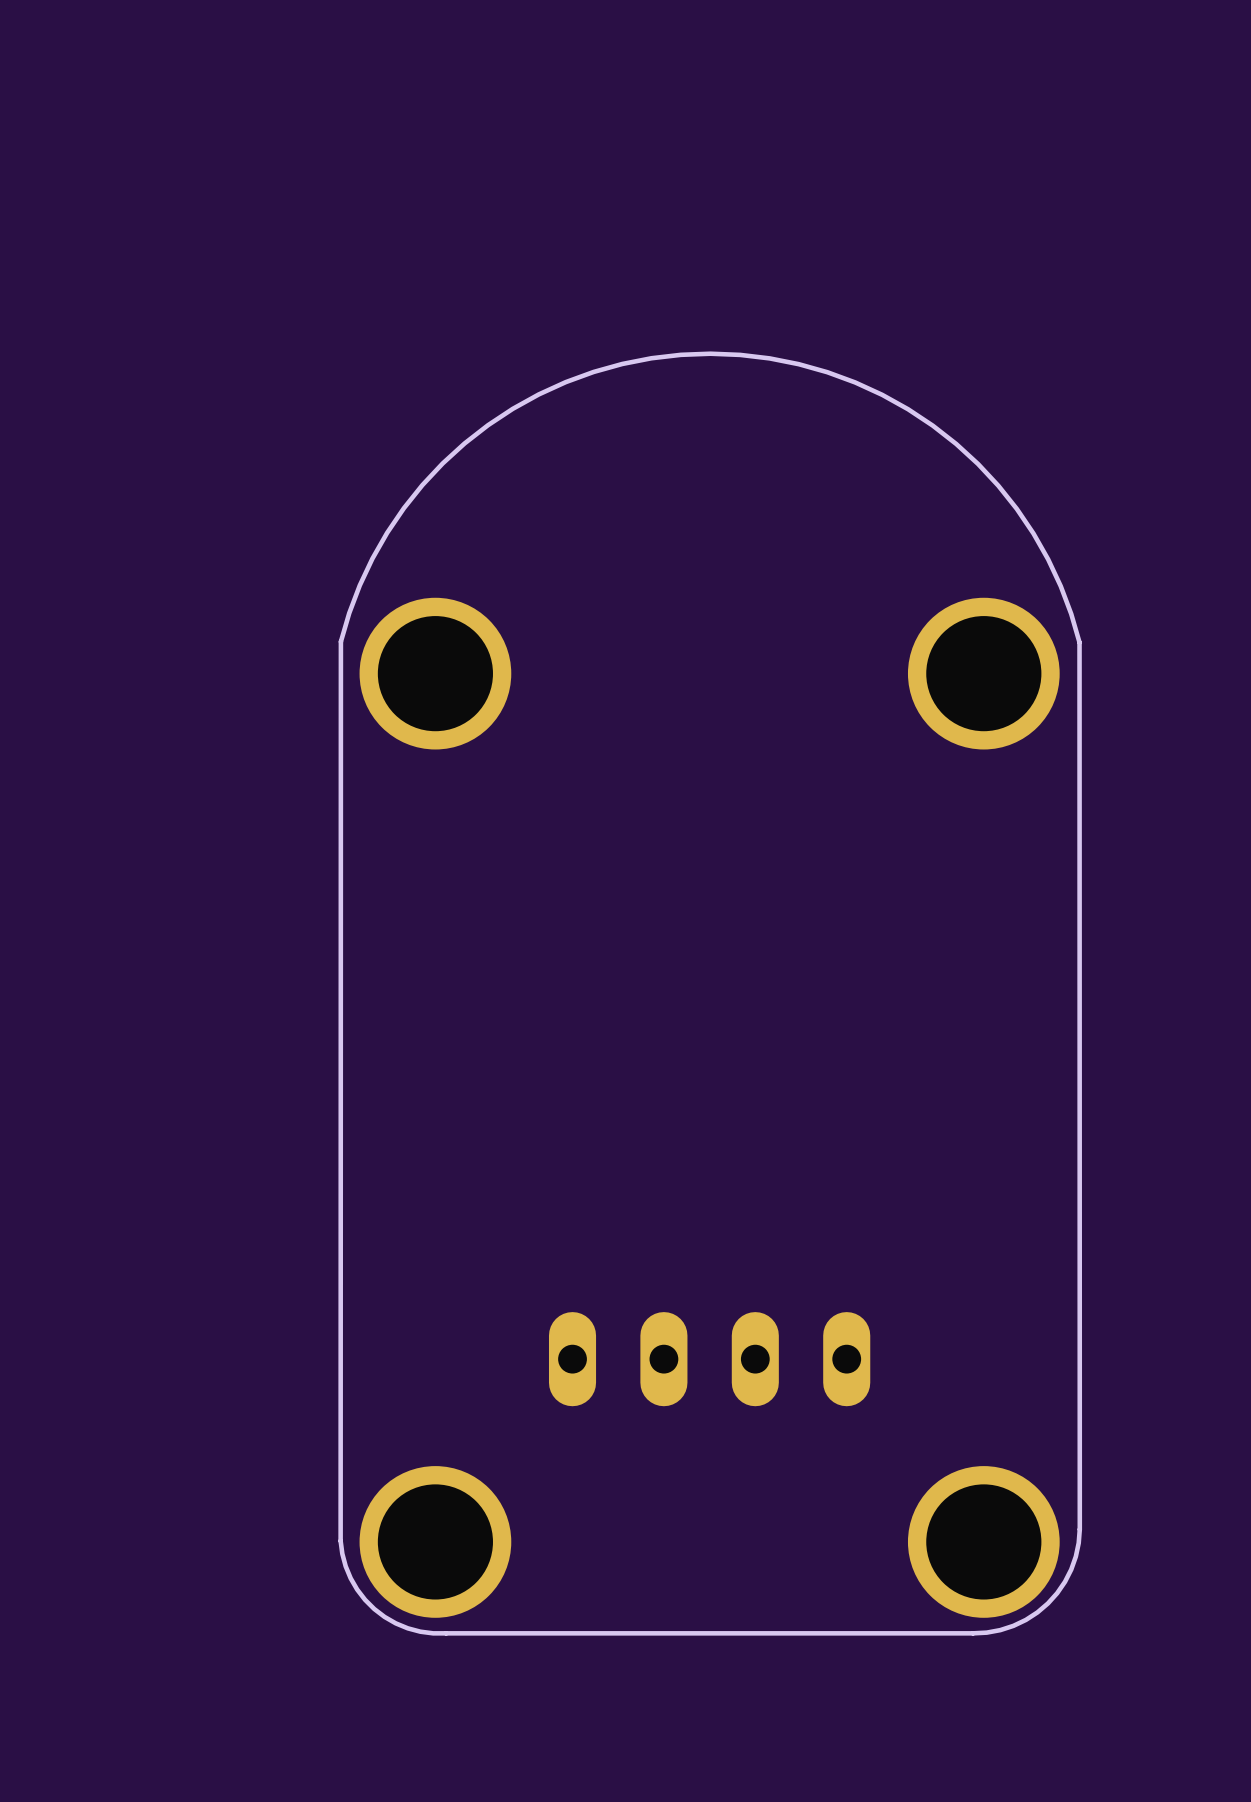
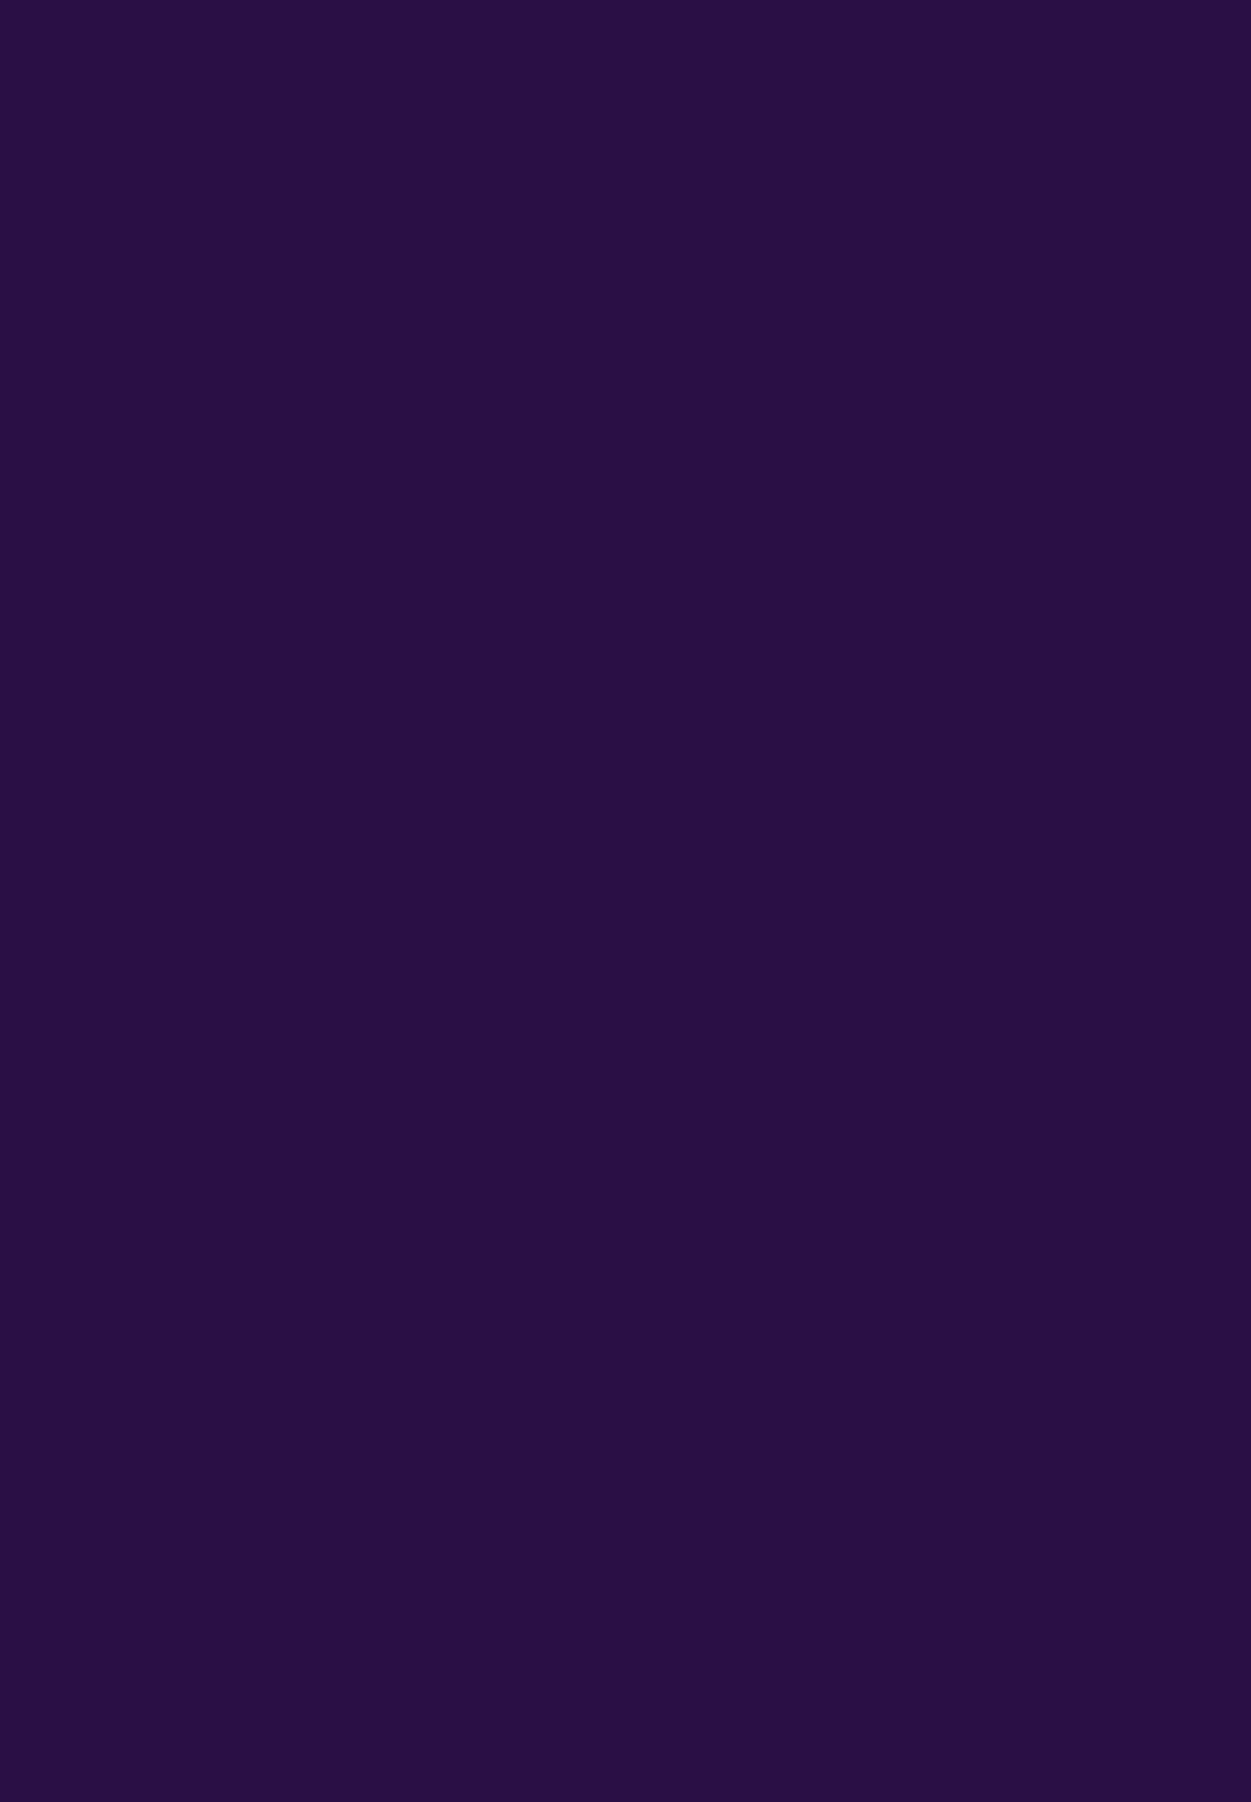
part: (710, 993) -> none

